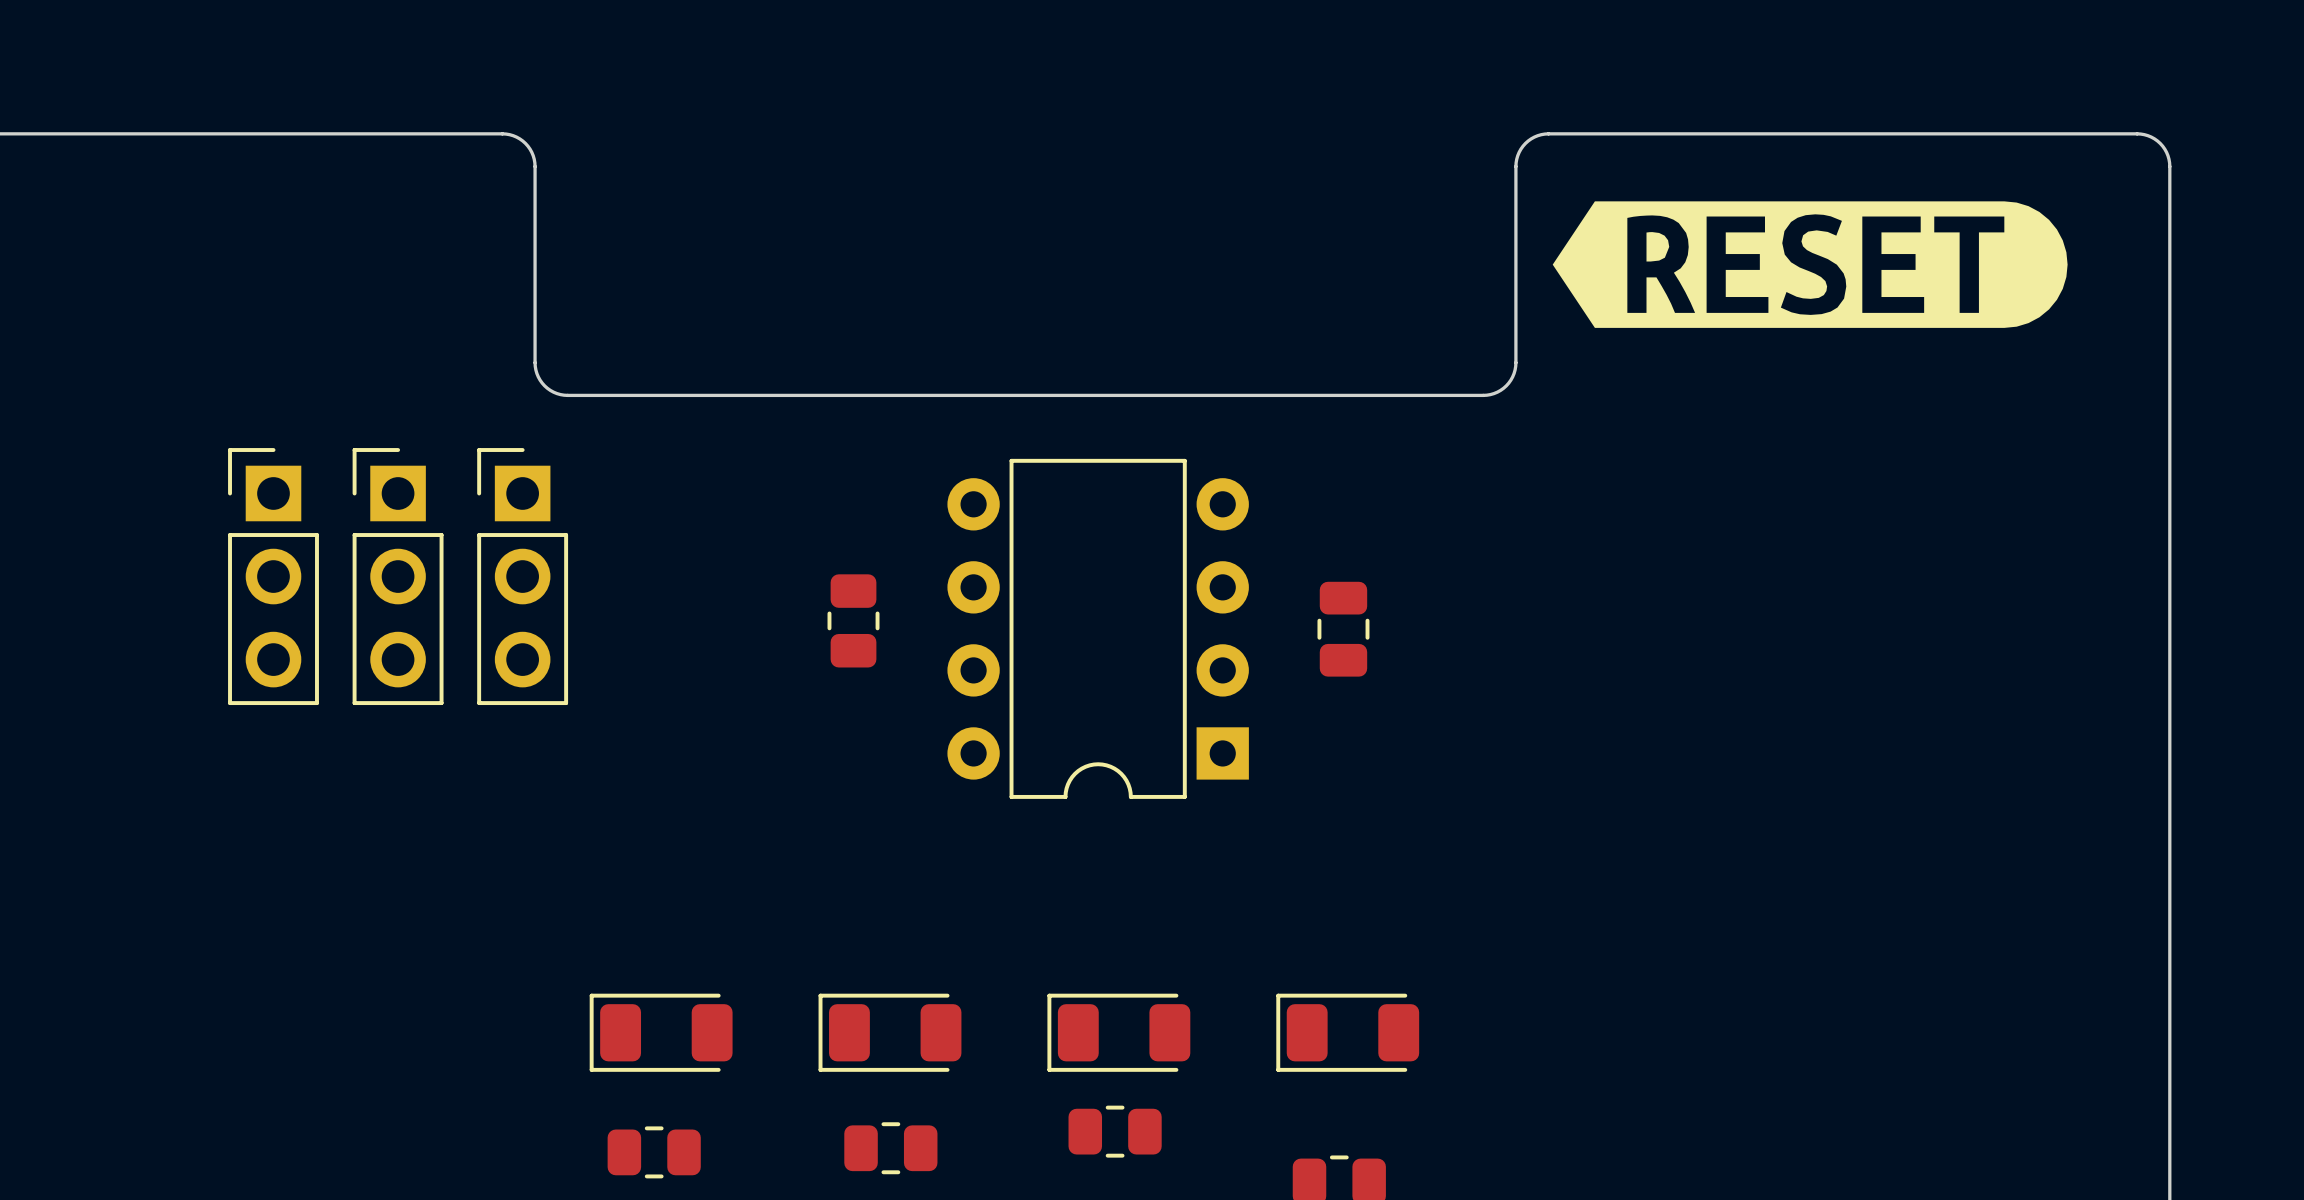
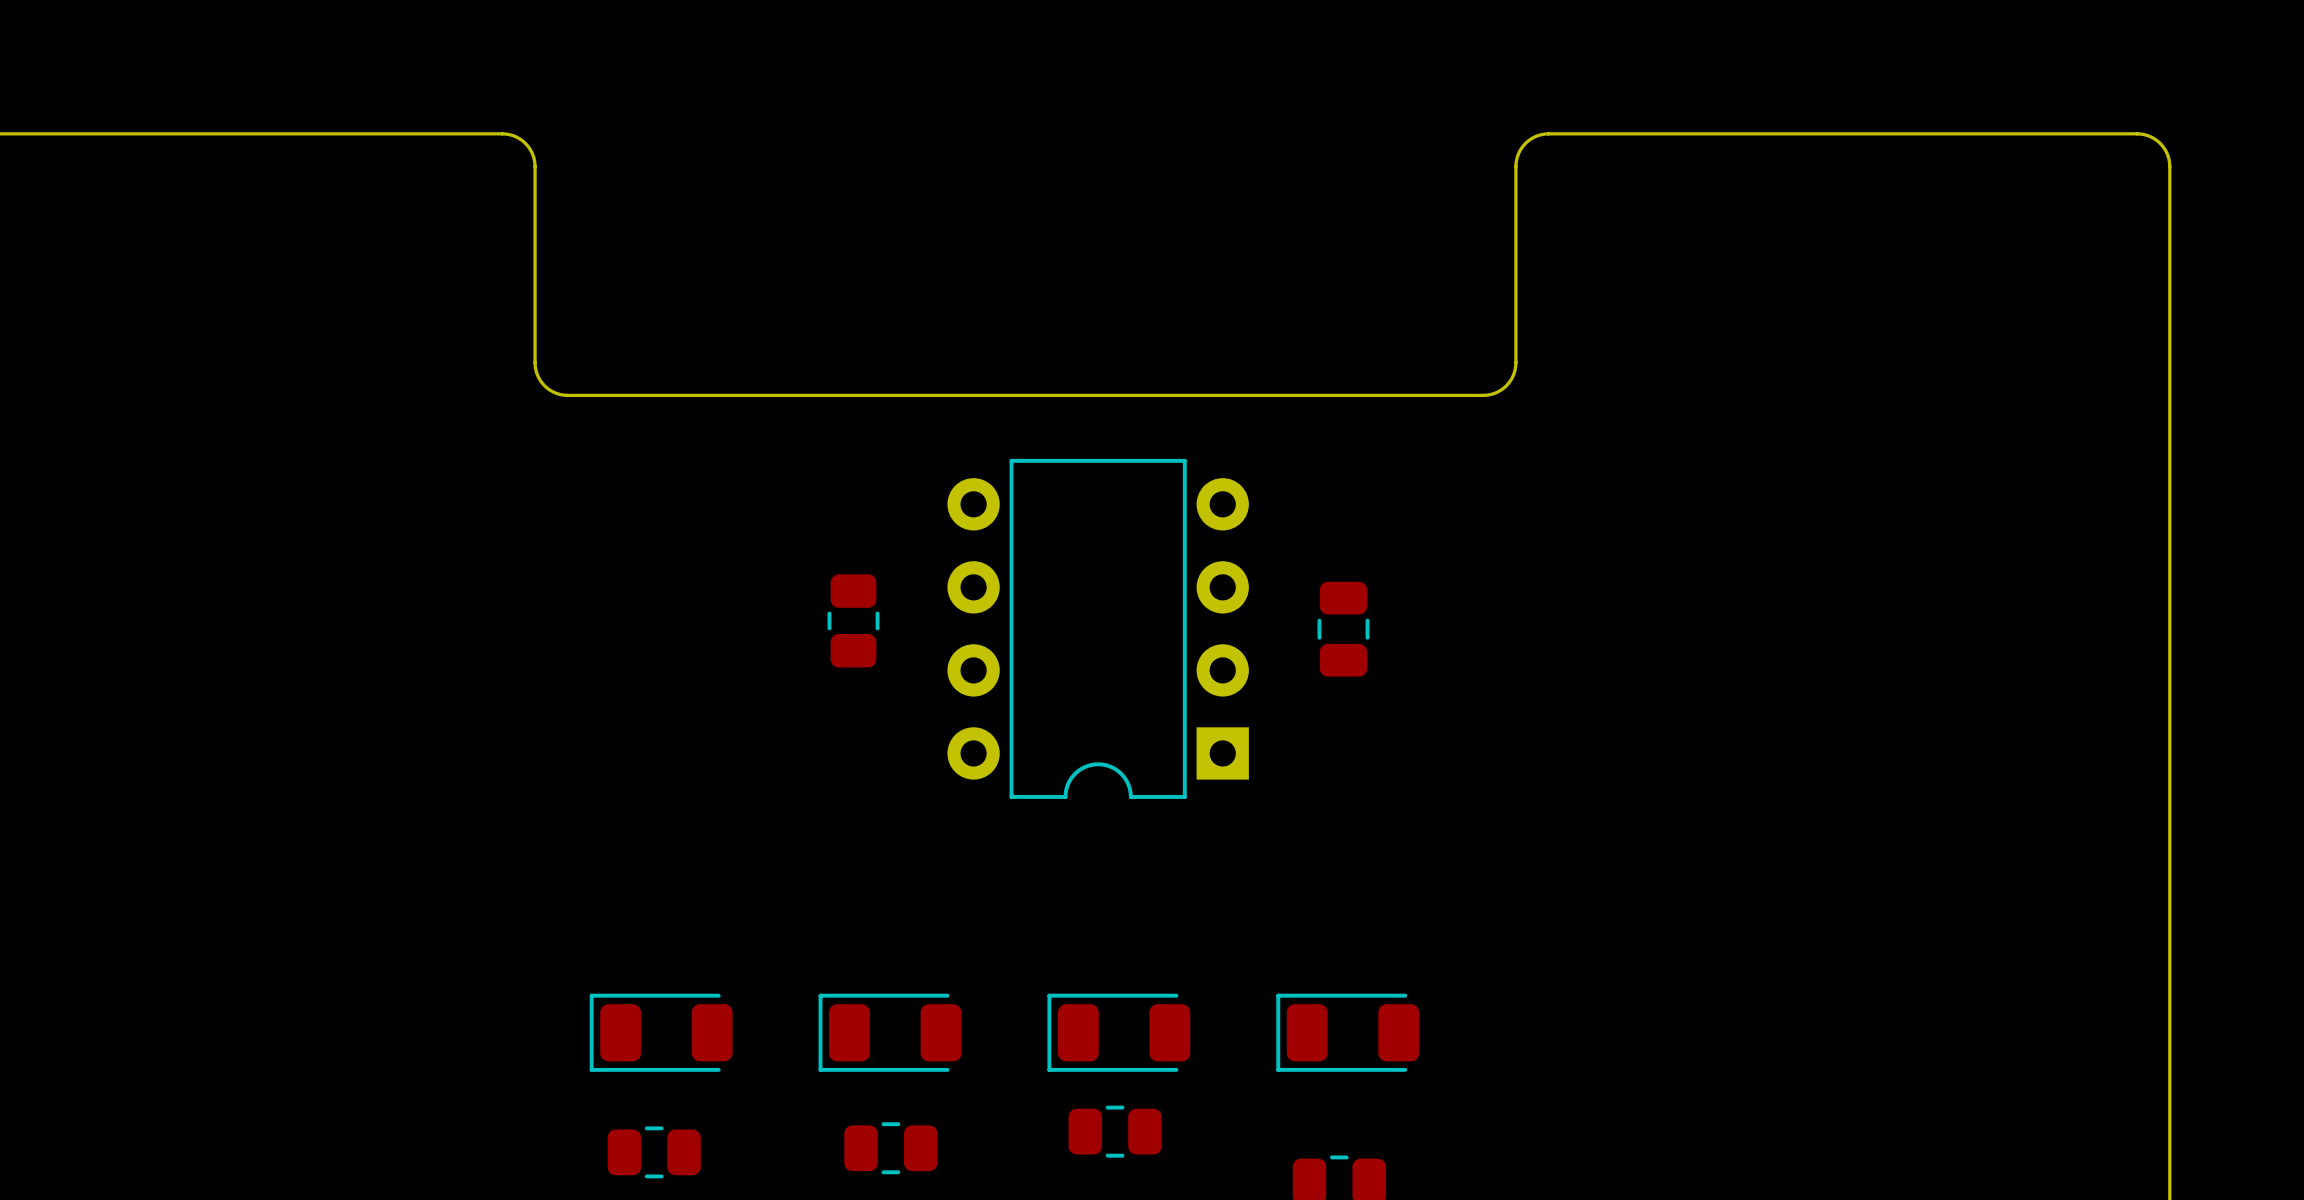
drawing: [1552, 201, 2068, 328] -> none
part: (273, 576) -> none
part: (398, 576) -> none
part: (522, 576) -> none

